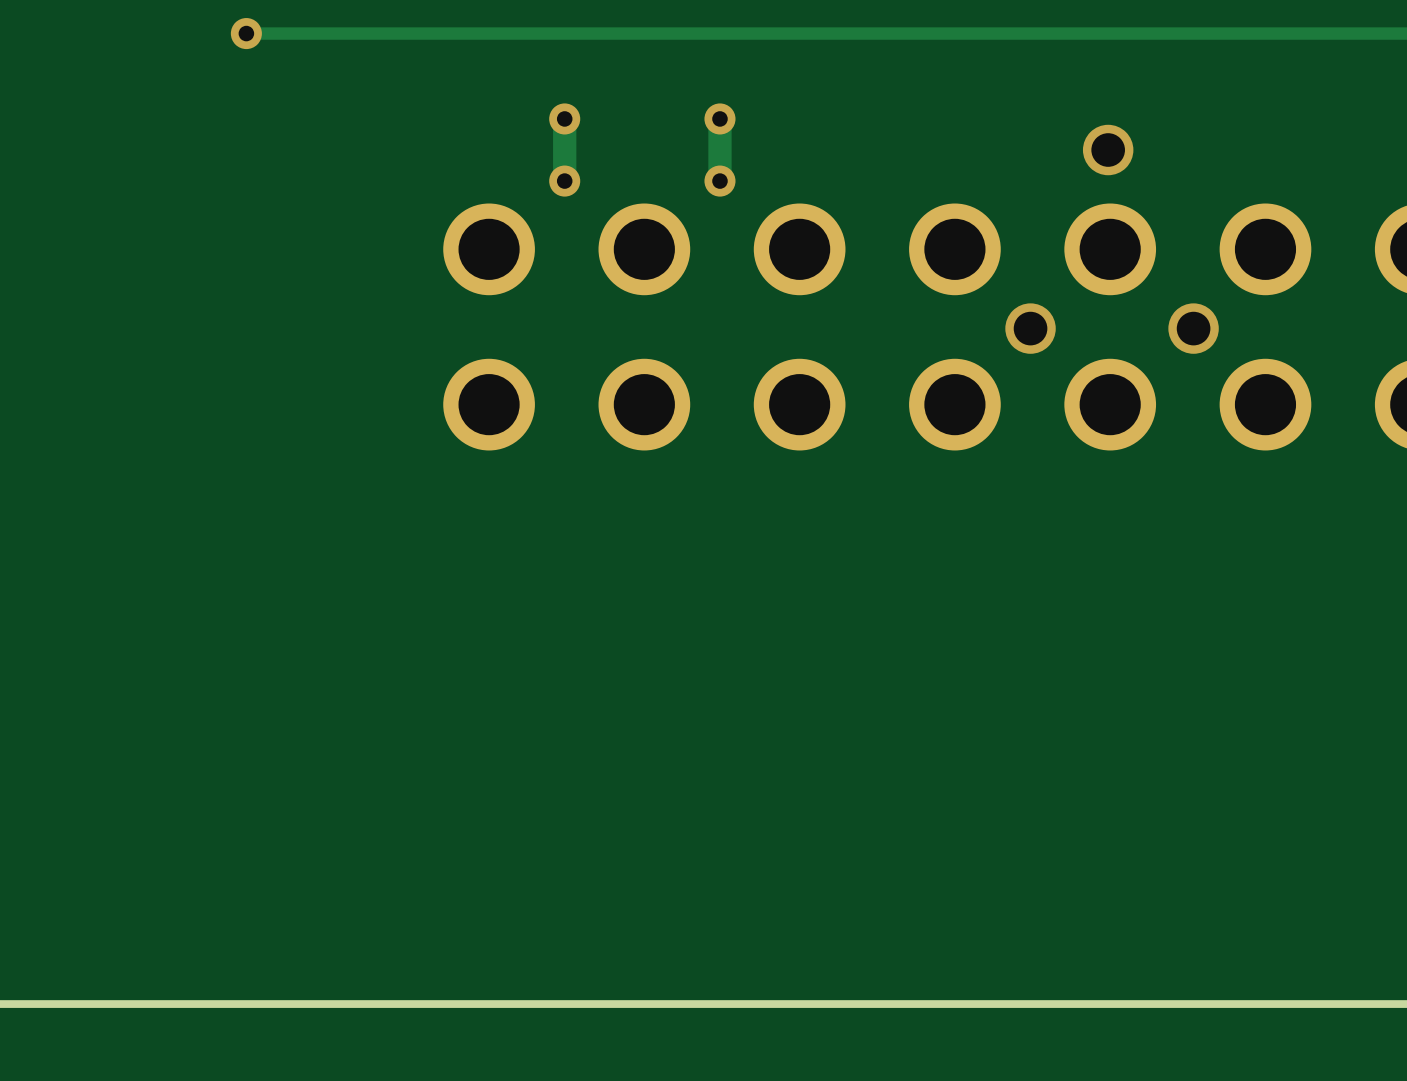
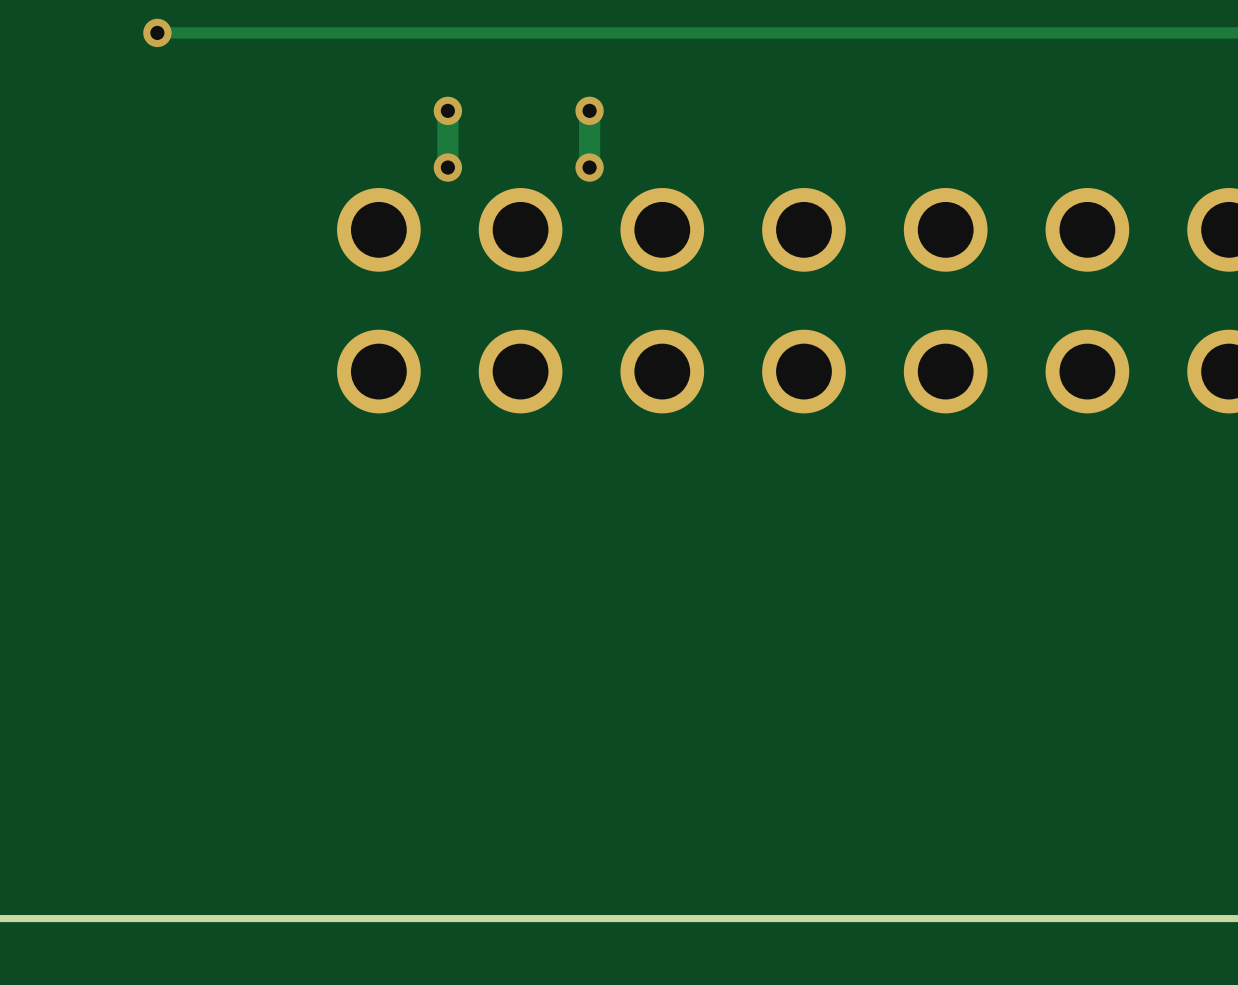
via: (1108, 150) -> none
via: (1030, 328) -> none
via: (1193, 328) -> none

